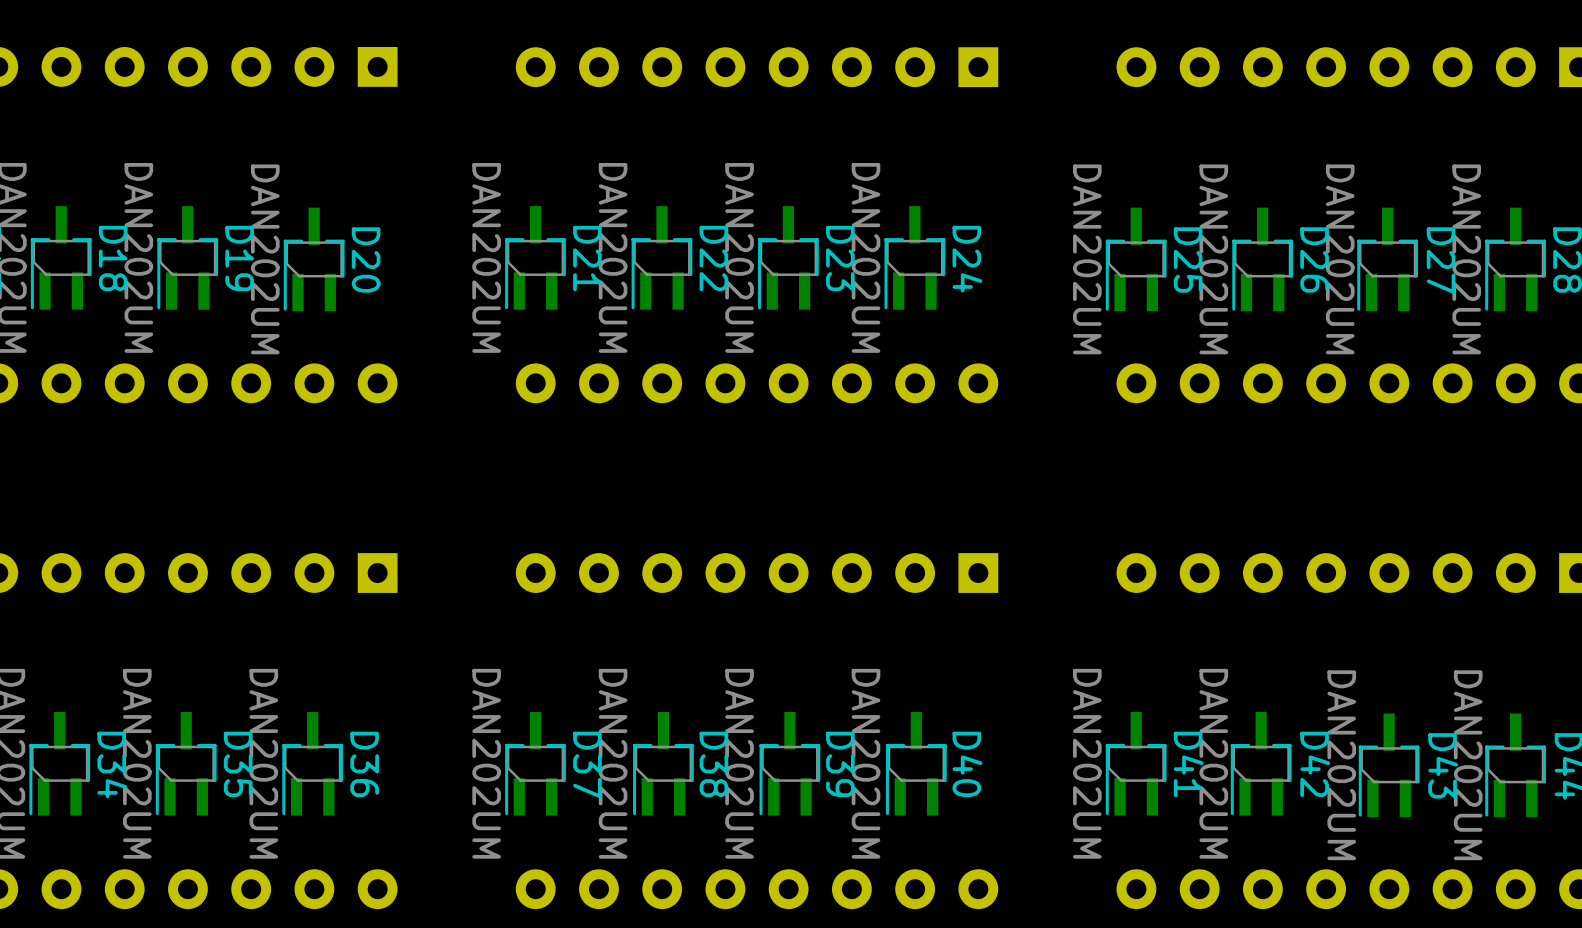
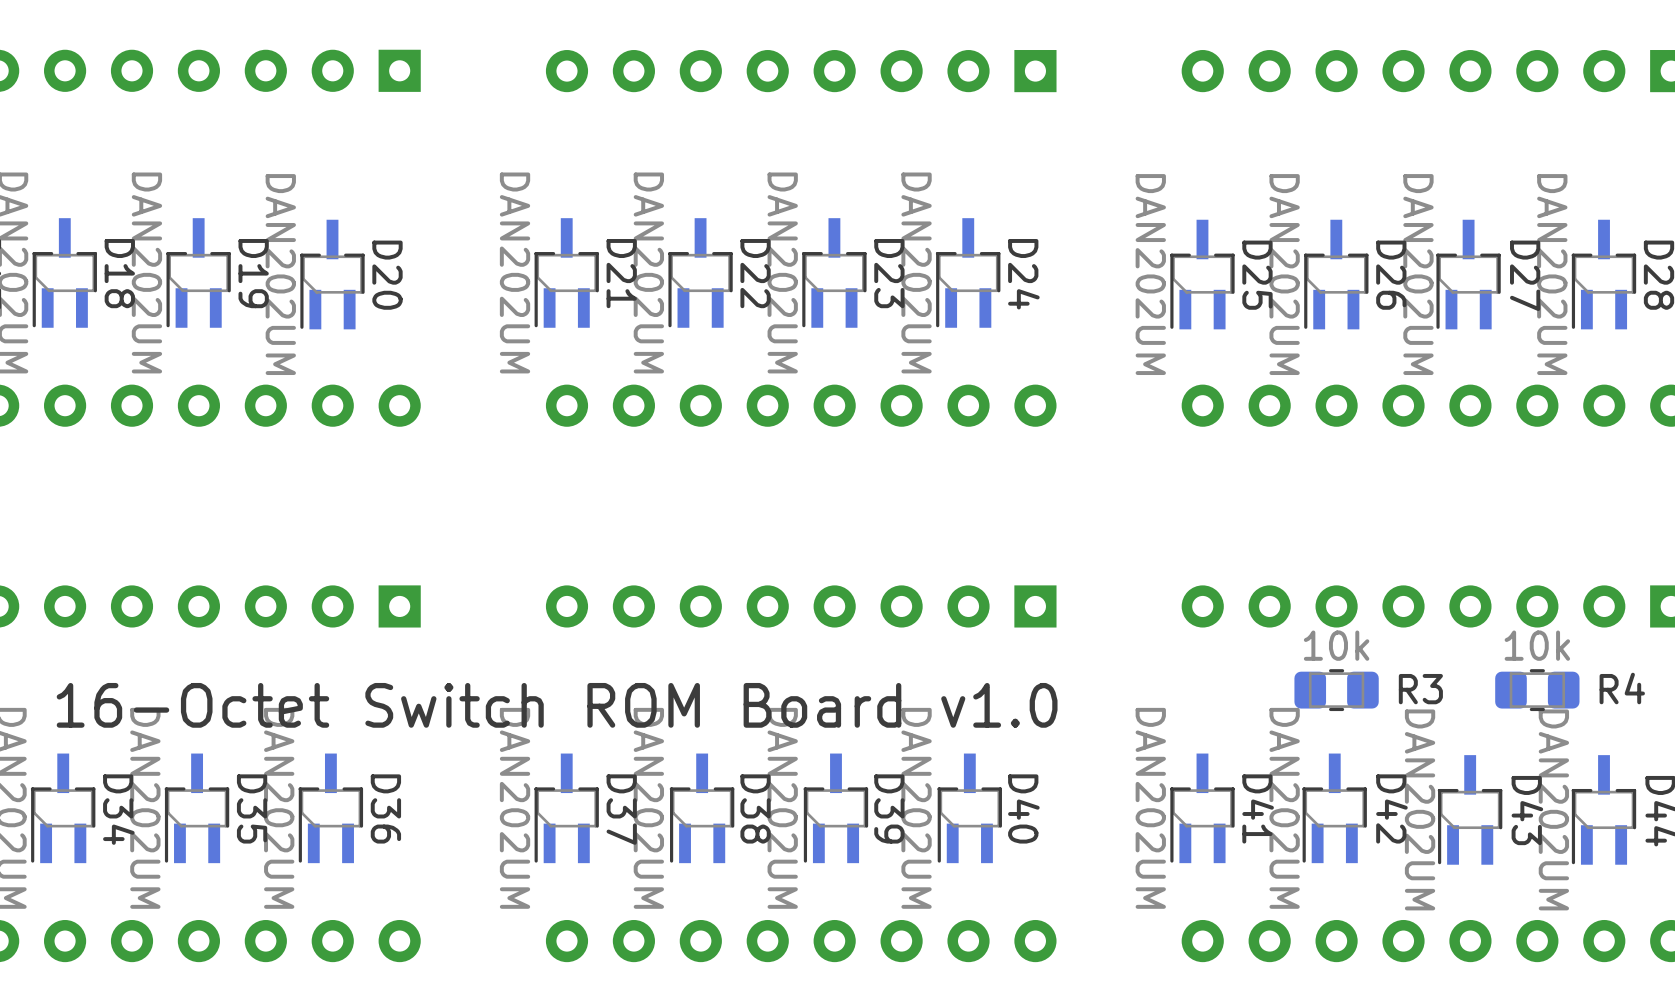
R3: none -> 10k (1336, 690)
R4: none -> 10k (1537, 690)
text: none -> 16-Octet Switch ROM Board v1.0 (557, 705)

